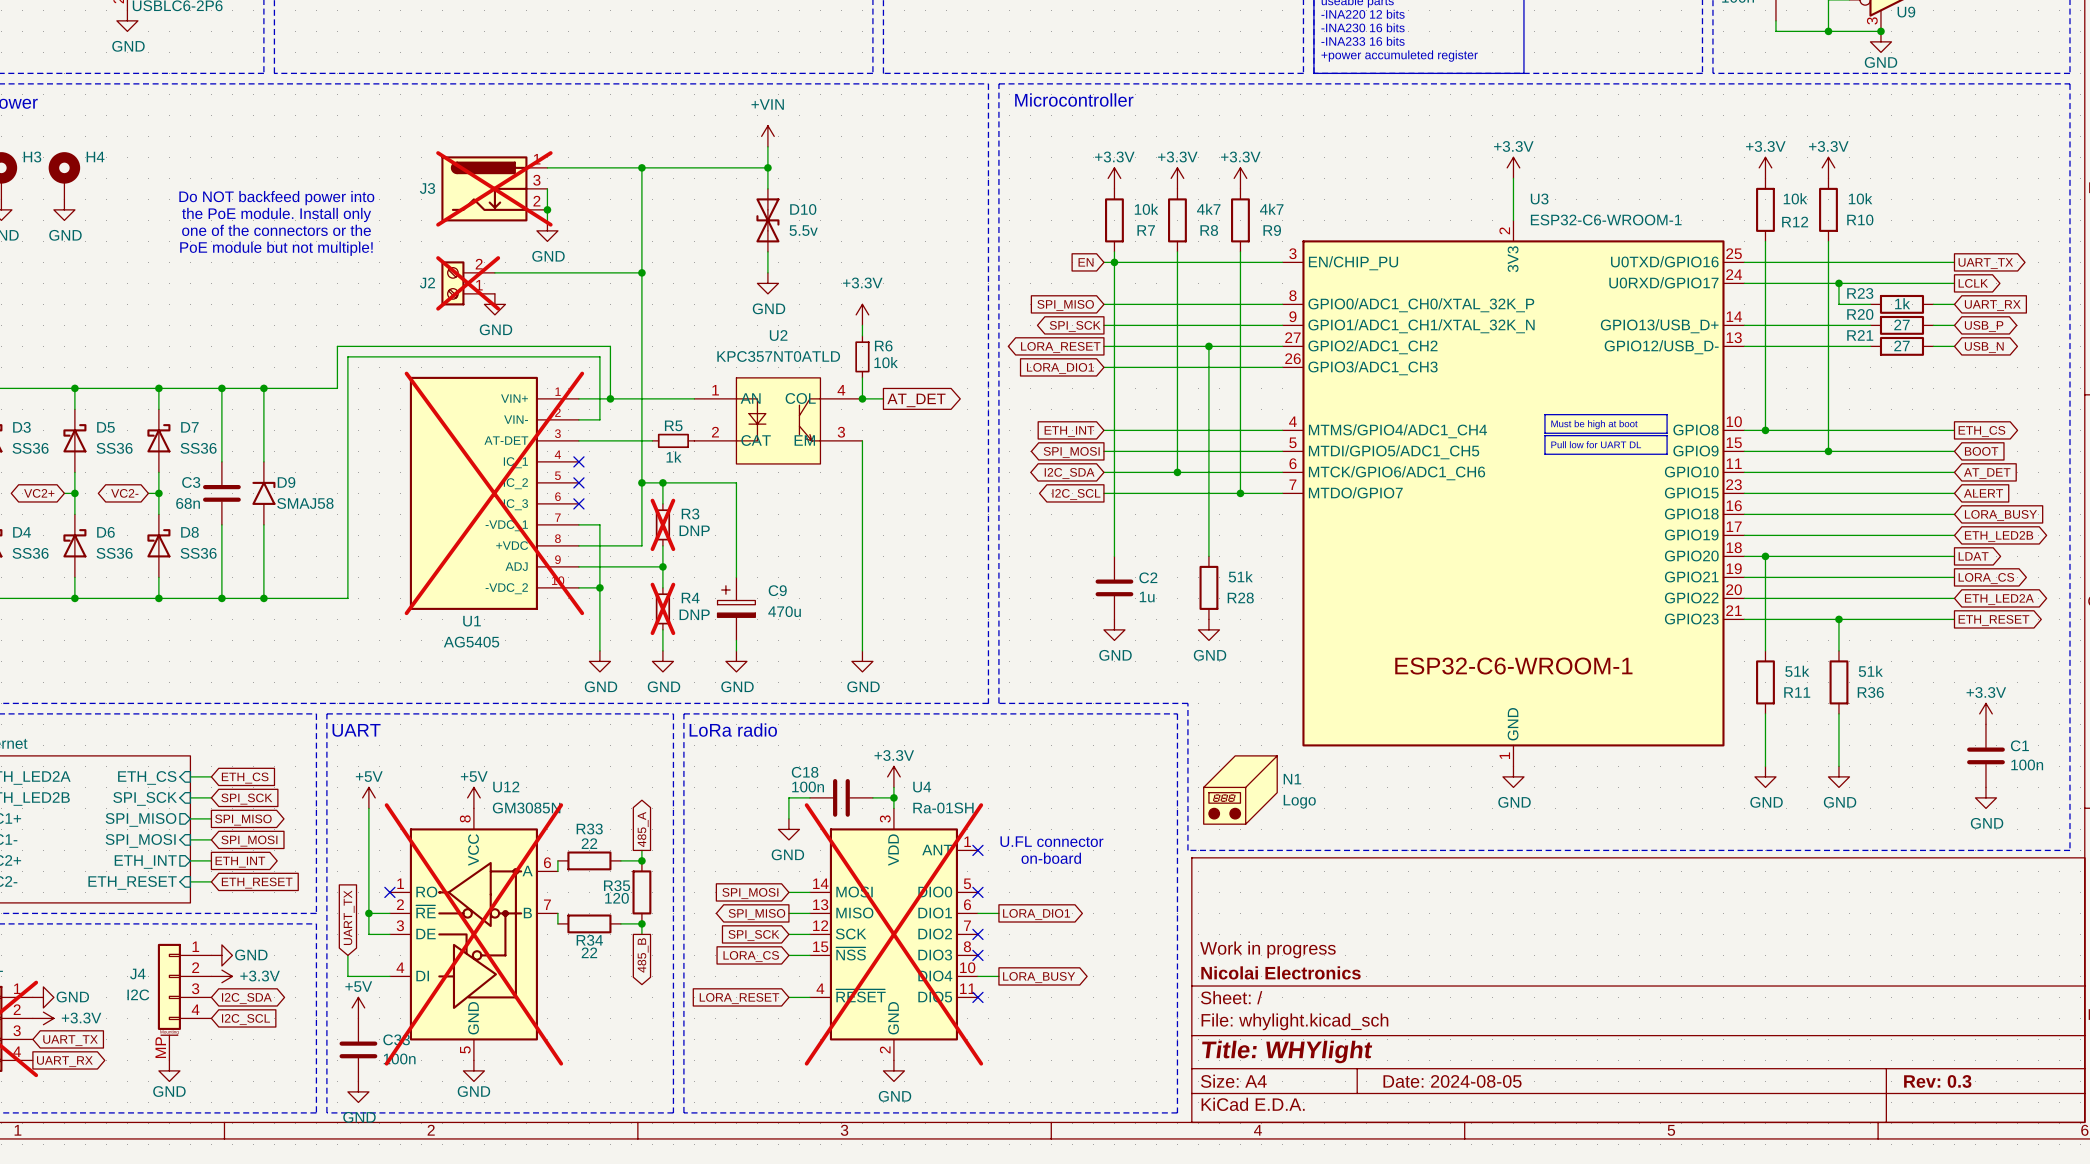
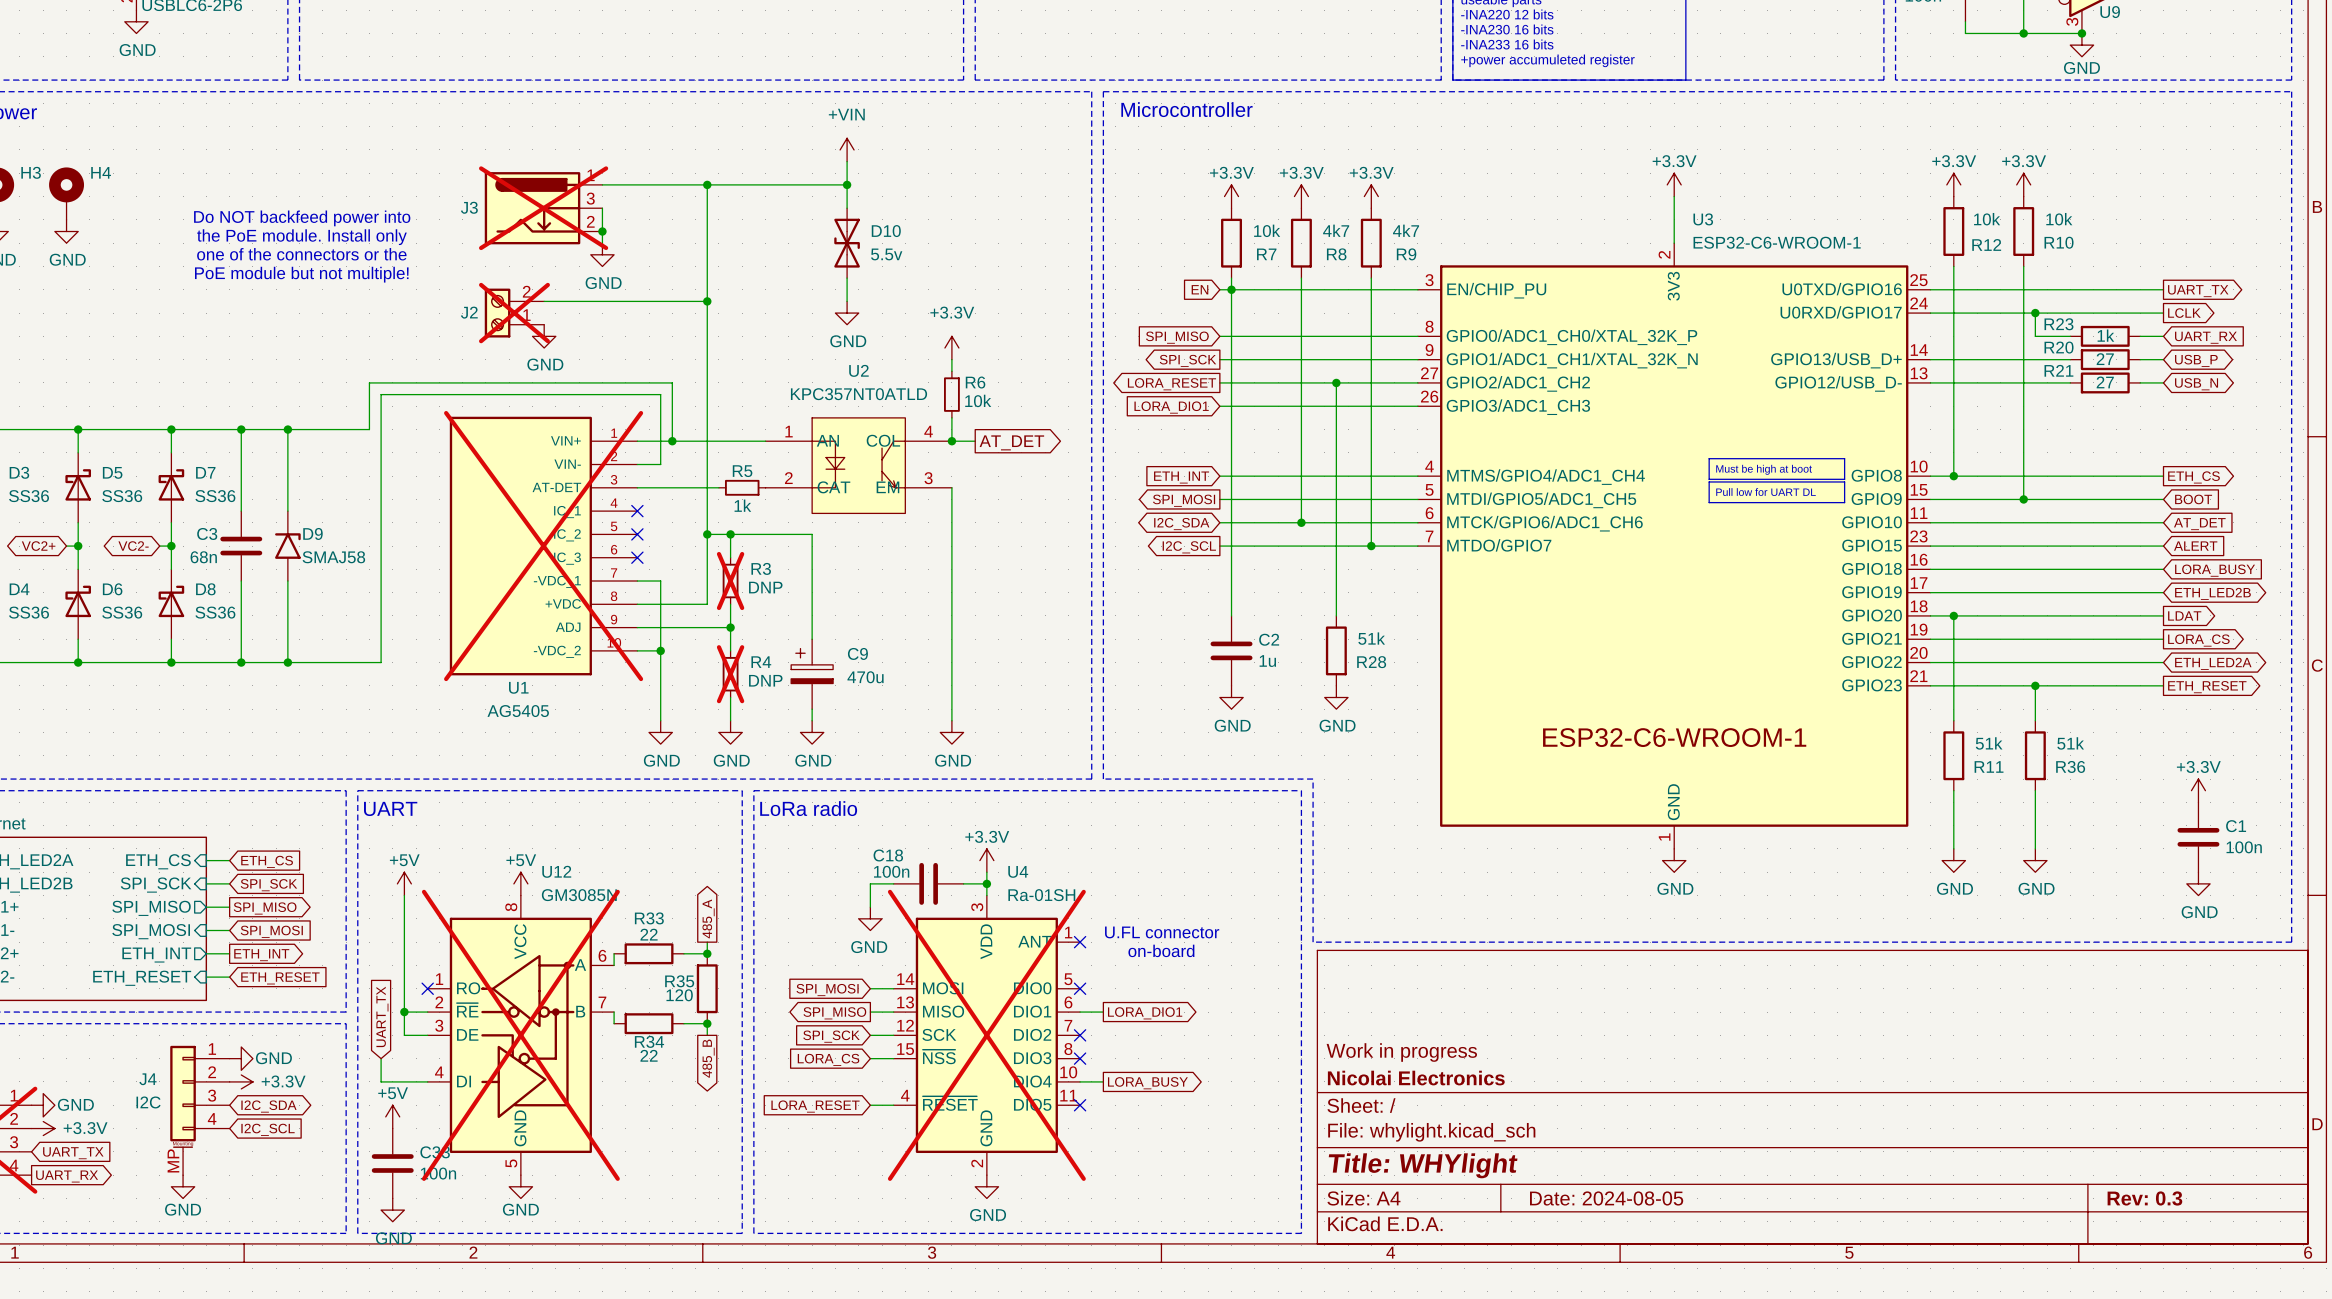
N1: Logo (1240, 790) -> none

